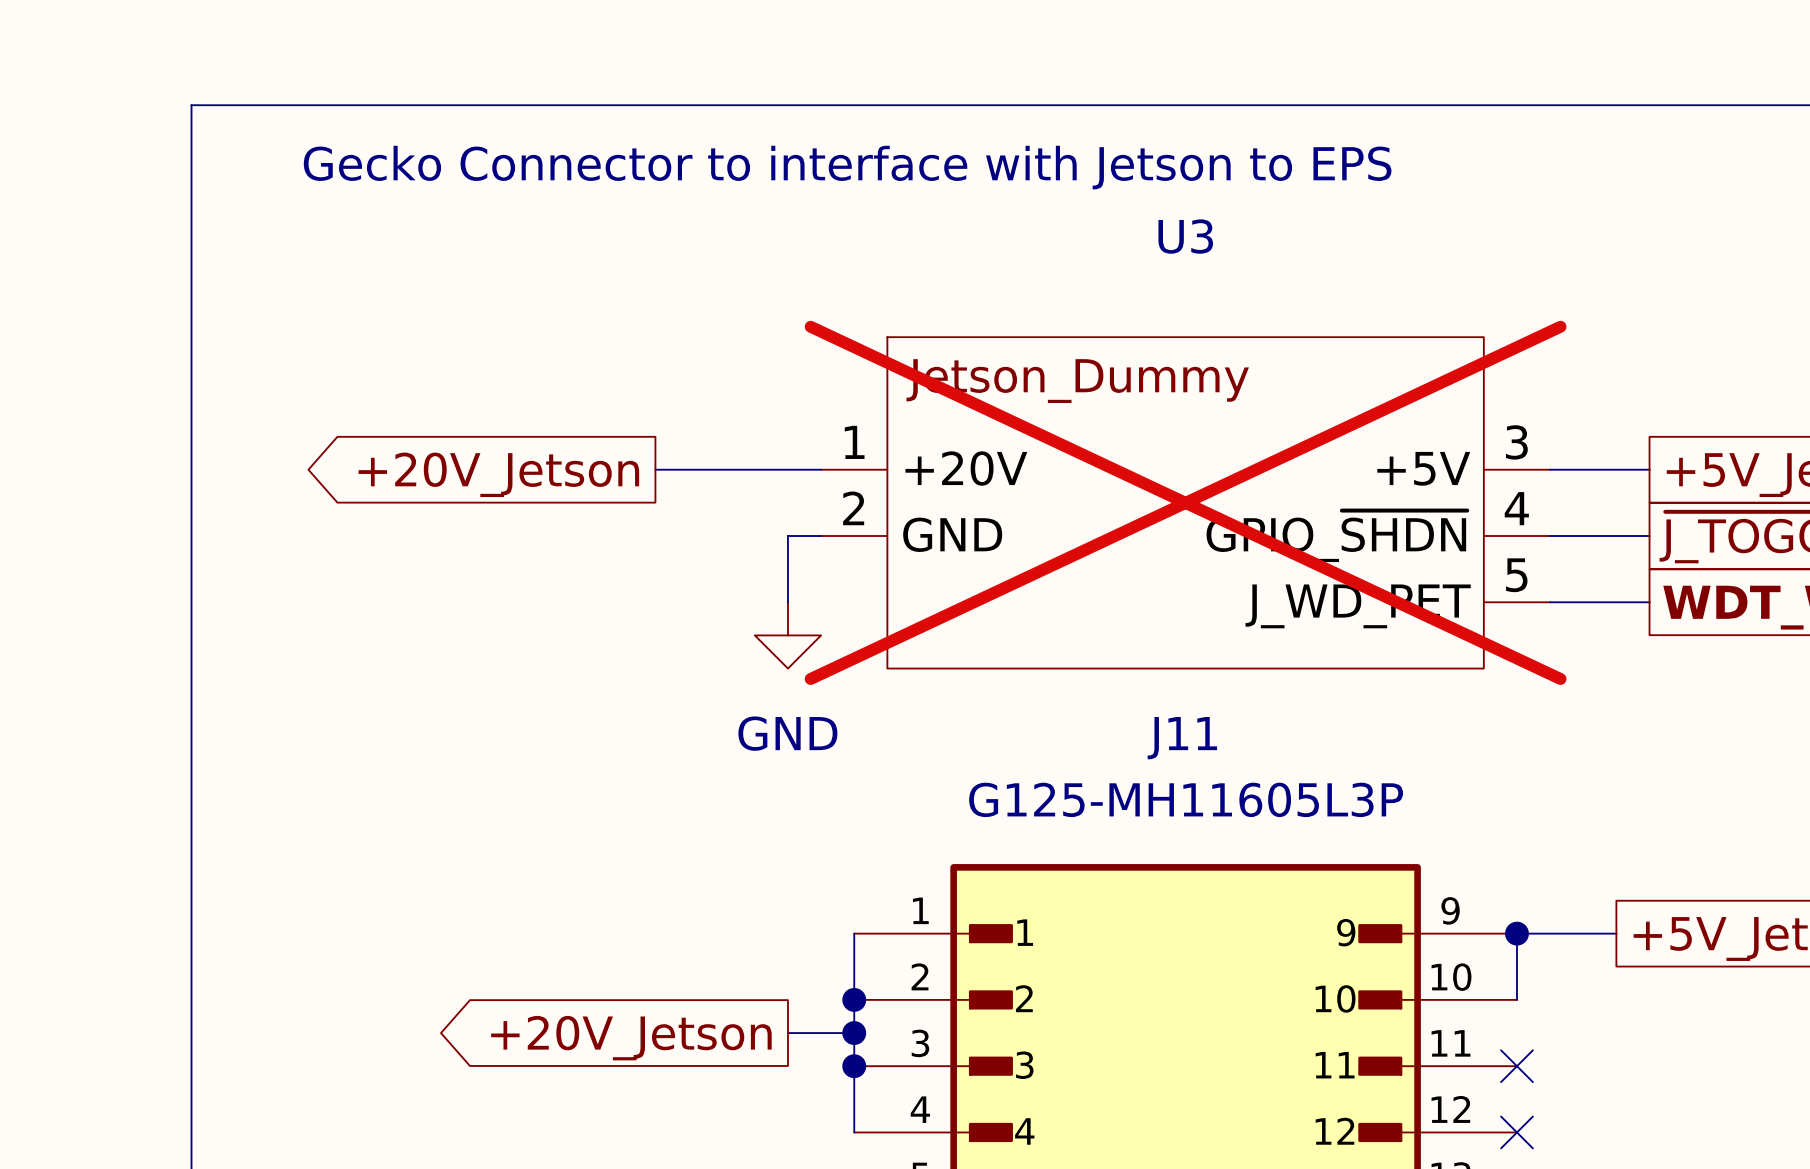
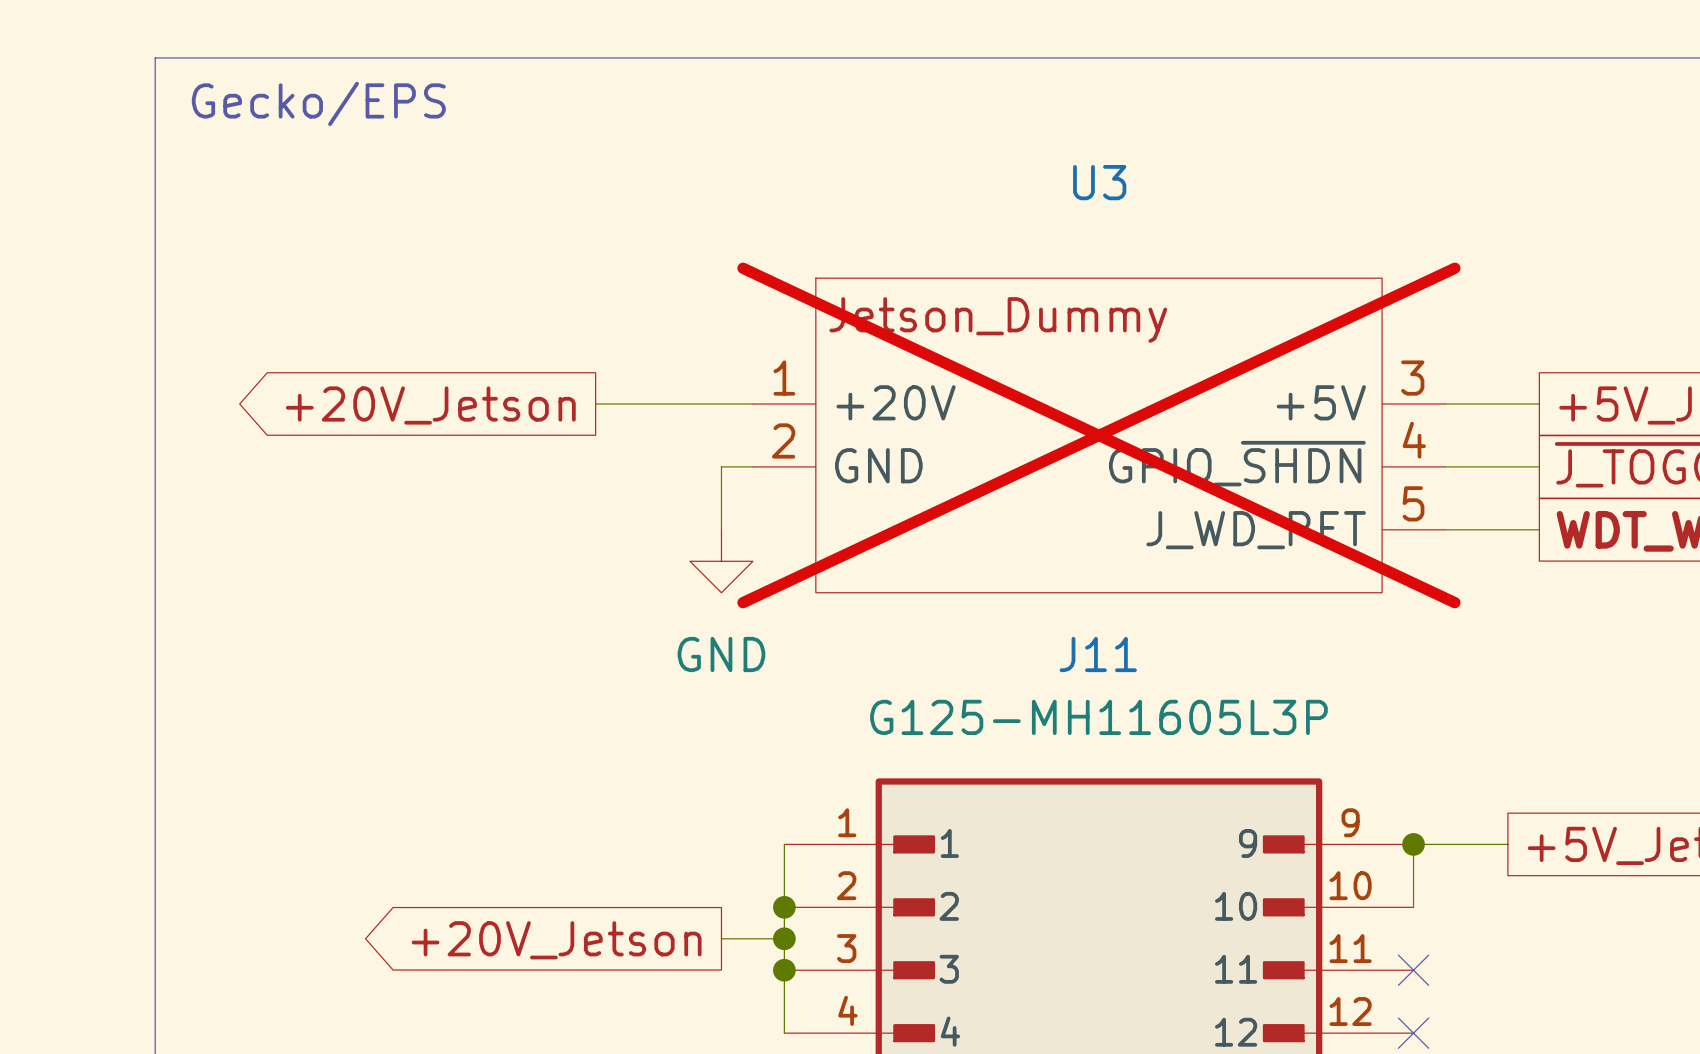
text: none -> Gecko/EPS (318, 103)
text: Gecko Connector to interface with Jetson to EPS (847, 167) -> none

